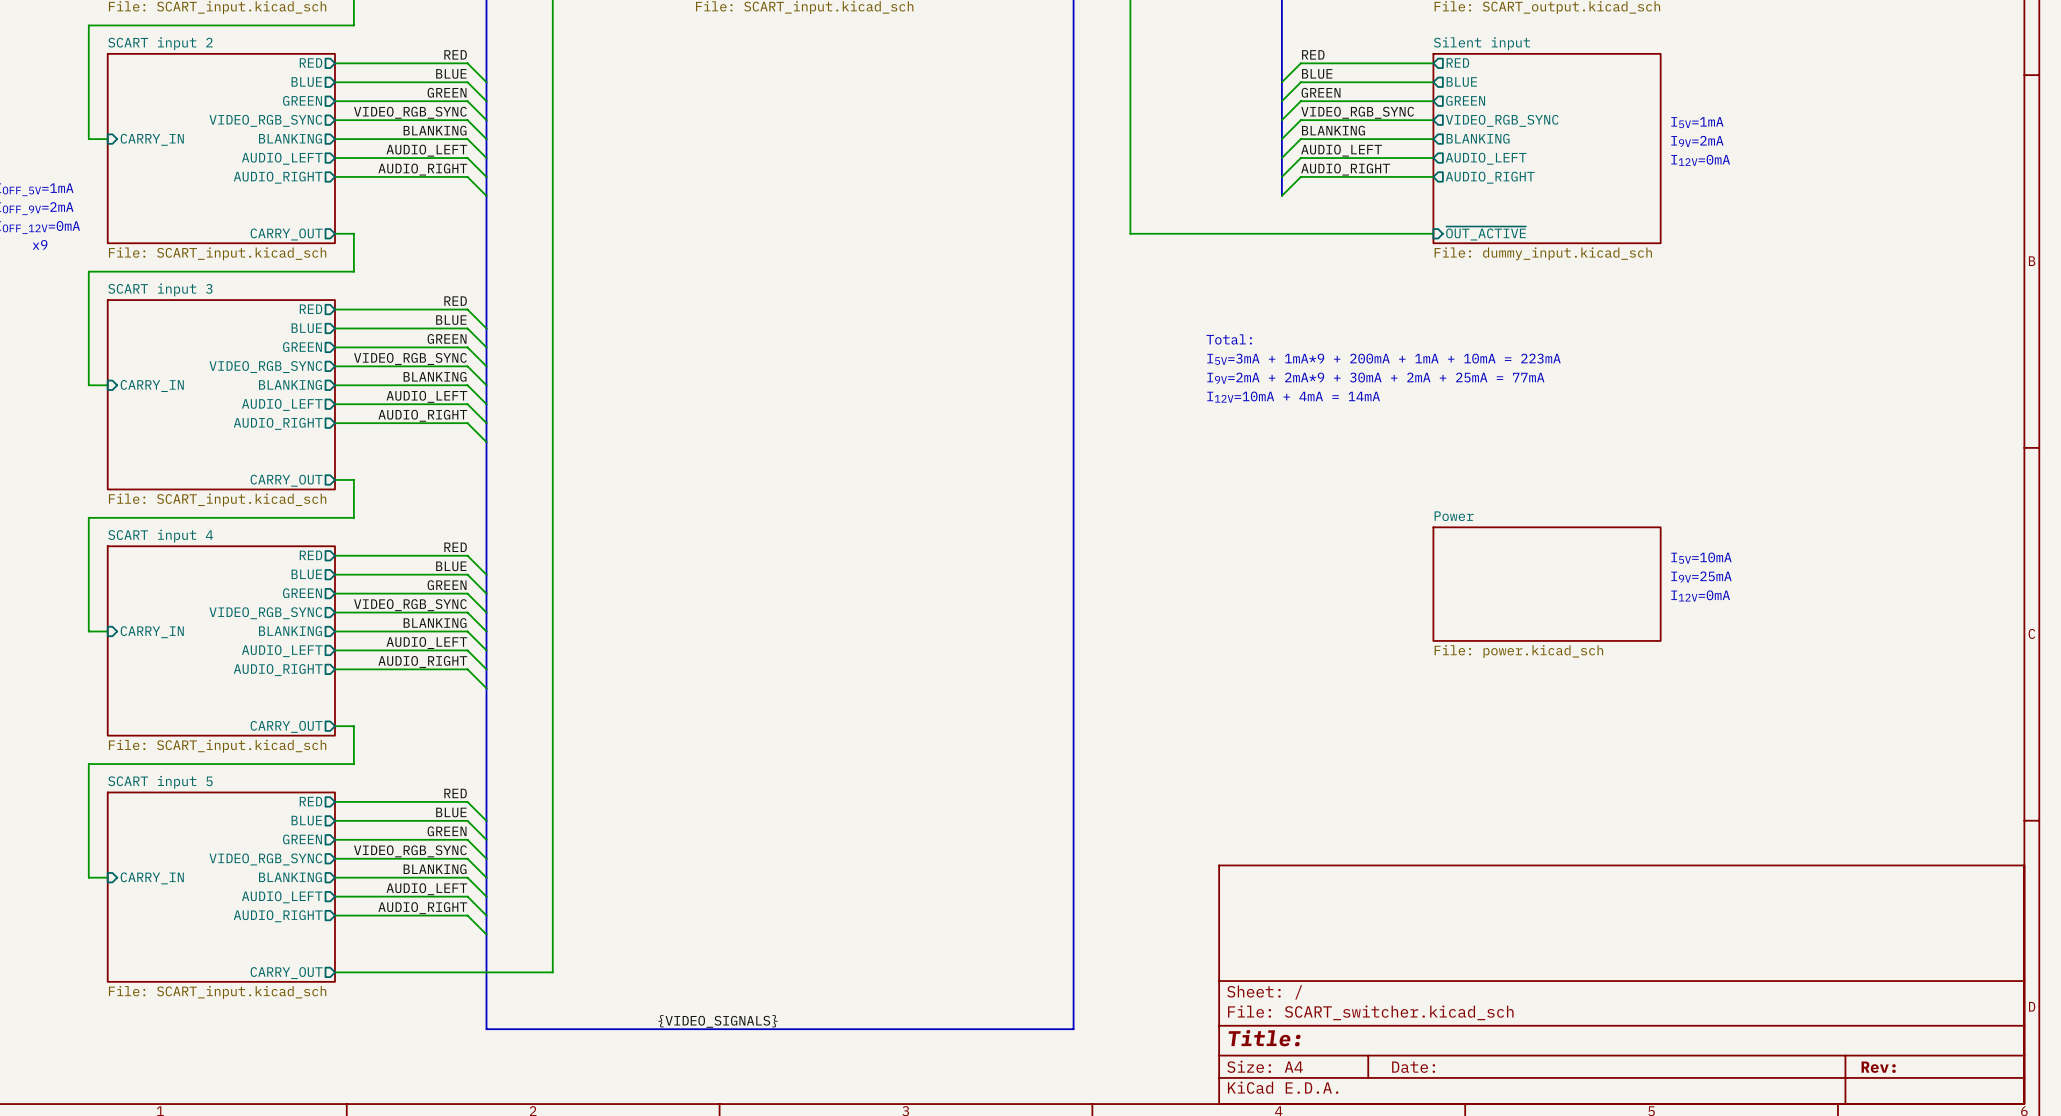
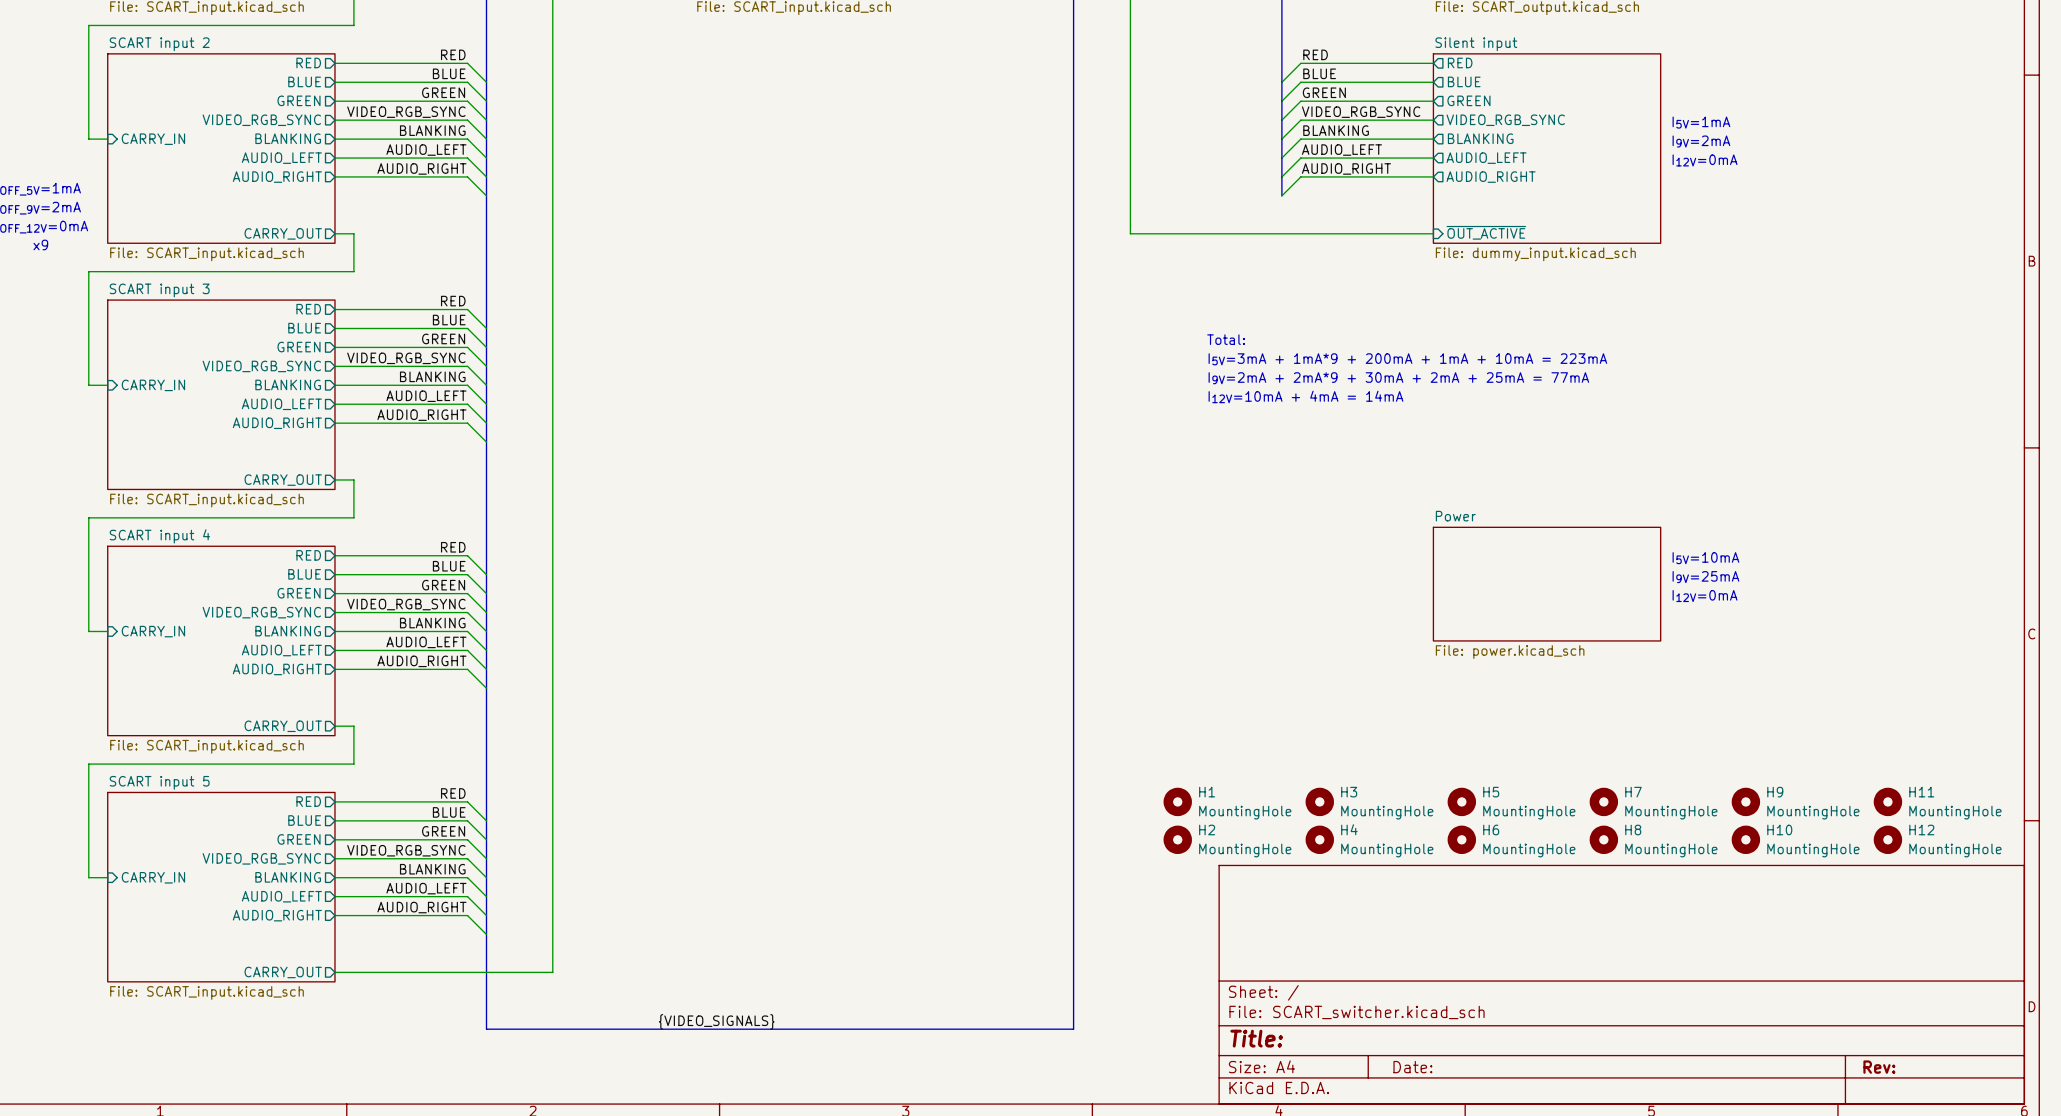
H1: none -> MountingHole (1177, 801)
H3: none -> MountingHole (1319, 801)
H5: none -> MountingHole (1461, 801)
H7: none -> MountingHole (1603, 801)
H9: none -> MountingHole (1745, 801)
H11: none -> MountingHole (1887, 801)
H2: none -> MountingHole (1177, 839)
H4: none -> MountingHole (1319, 839)
H6: none -> MountingHole (1461, 839)
H8: none -> MountingHole (1603, 839)
H10: none -> MountingHole (1745, 839)
H12: none -> MountingHole (1887, 839)

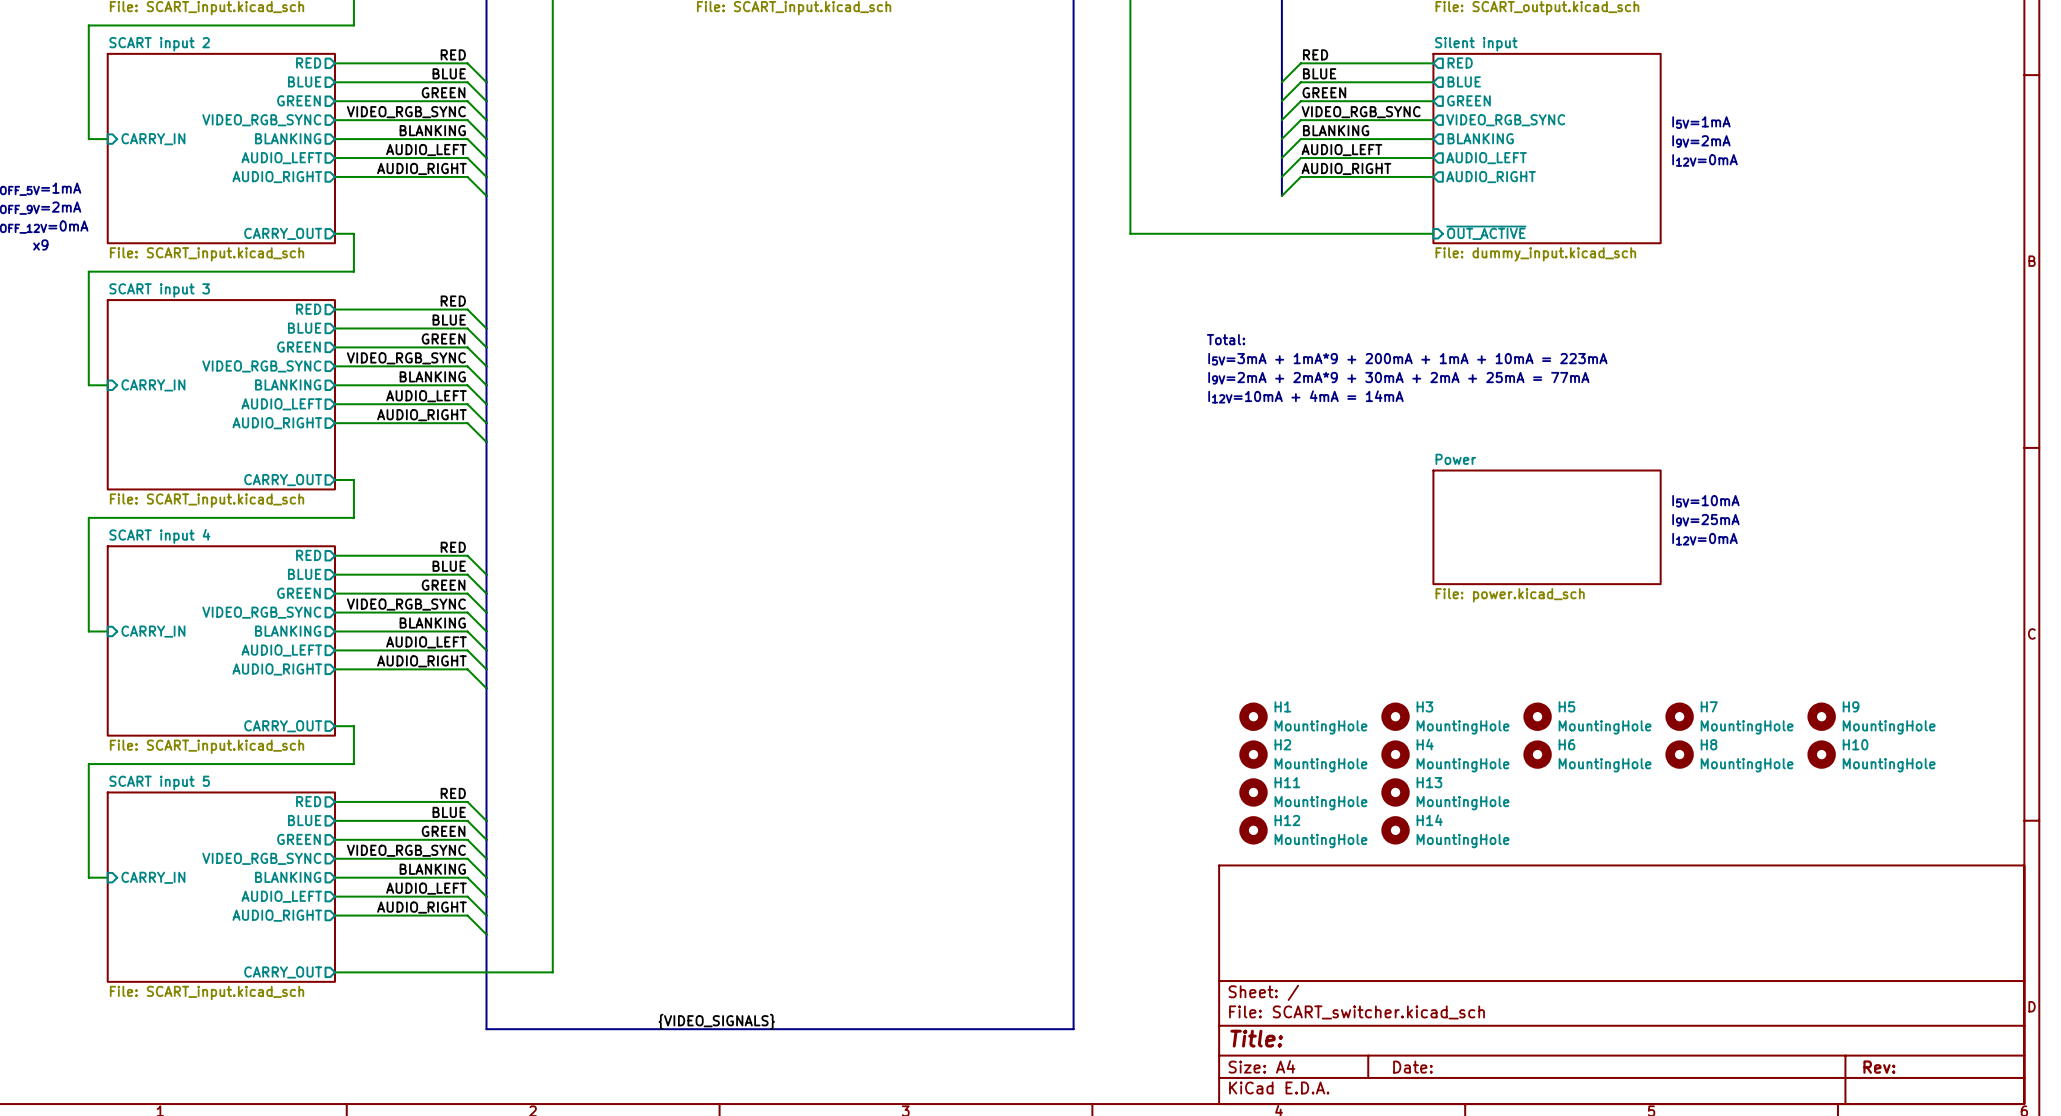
text position: I5V=10mA (1705, 558) -> I5V=10mA (1705, 501)
text position: I9V=25mA (1705, 577) -> I9V=25mA (1705, 520)
sheet Power position: (1547, 584) -> (1547, 527)
text position: I12V=0mA (1705, 596) -> I12V=0mA (1705, 539)
H13: none -> MountingHole (1395, 792)
H1 position: (1177, 801) -> (1253, 716)
H3 position: (1319, 801) -> (1395, 716)
H5 position: (1461, 801) -> (1537, 716)
H7 position: (1603, 801) -> (1679, 716)
H9 position: (1745, 801) -> (1821, 716)
H11 position: (1887, 801) -> (1253, 792)
H14: none -> MountingHole (1395, 830)
H2 position: (1177, 839) -> (1253, 754)
H4 position: (1319, 839) -> (1395, 754)
H6 position: (1461, 839) -> (1537, 754)
H8 position: (1603, 839) -> (1679, 754)
H10 position: (1745, 839) -> (1821, 754)
H12 position: (1887, 839) -> (1253, 830)

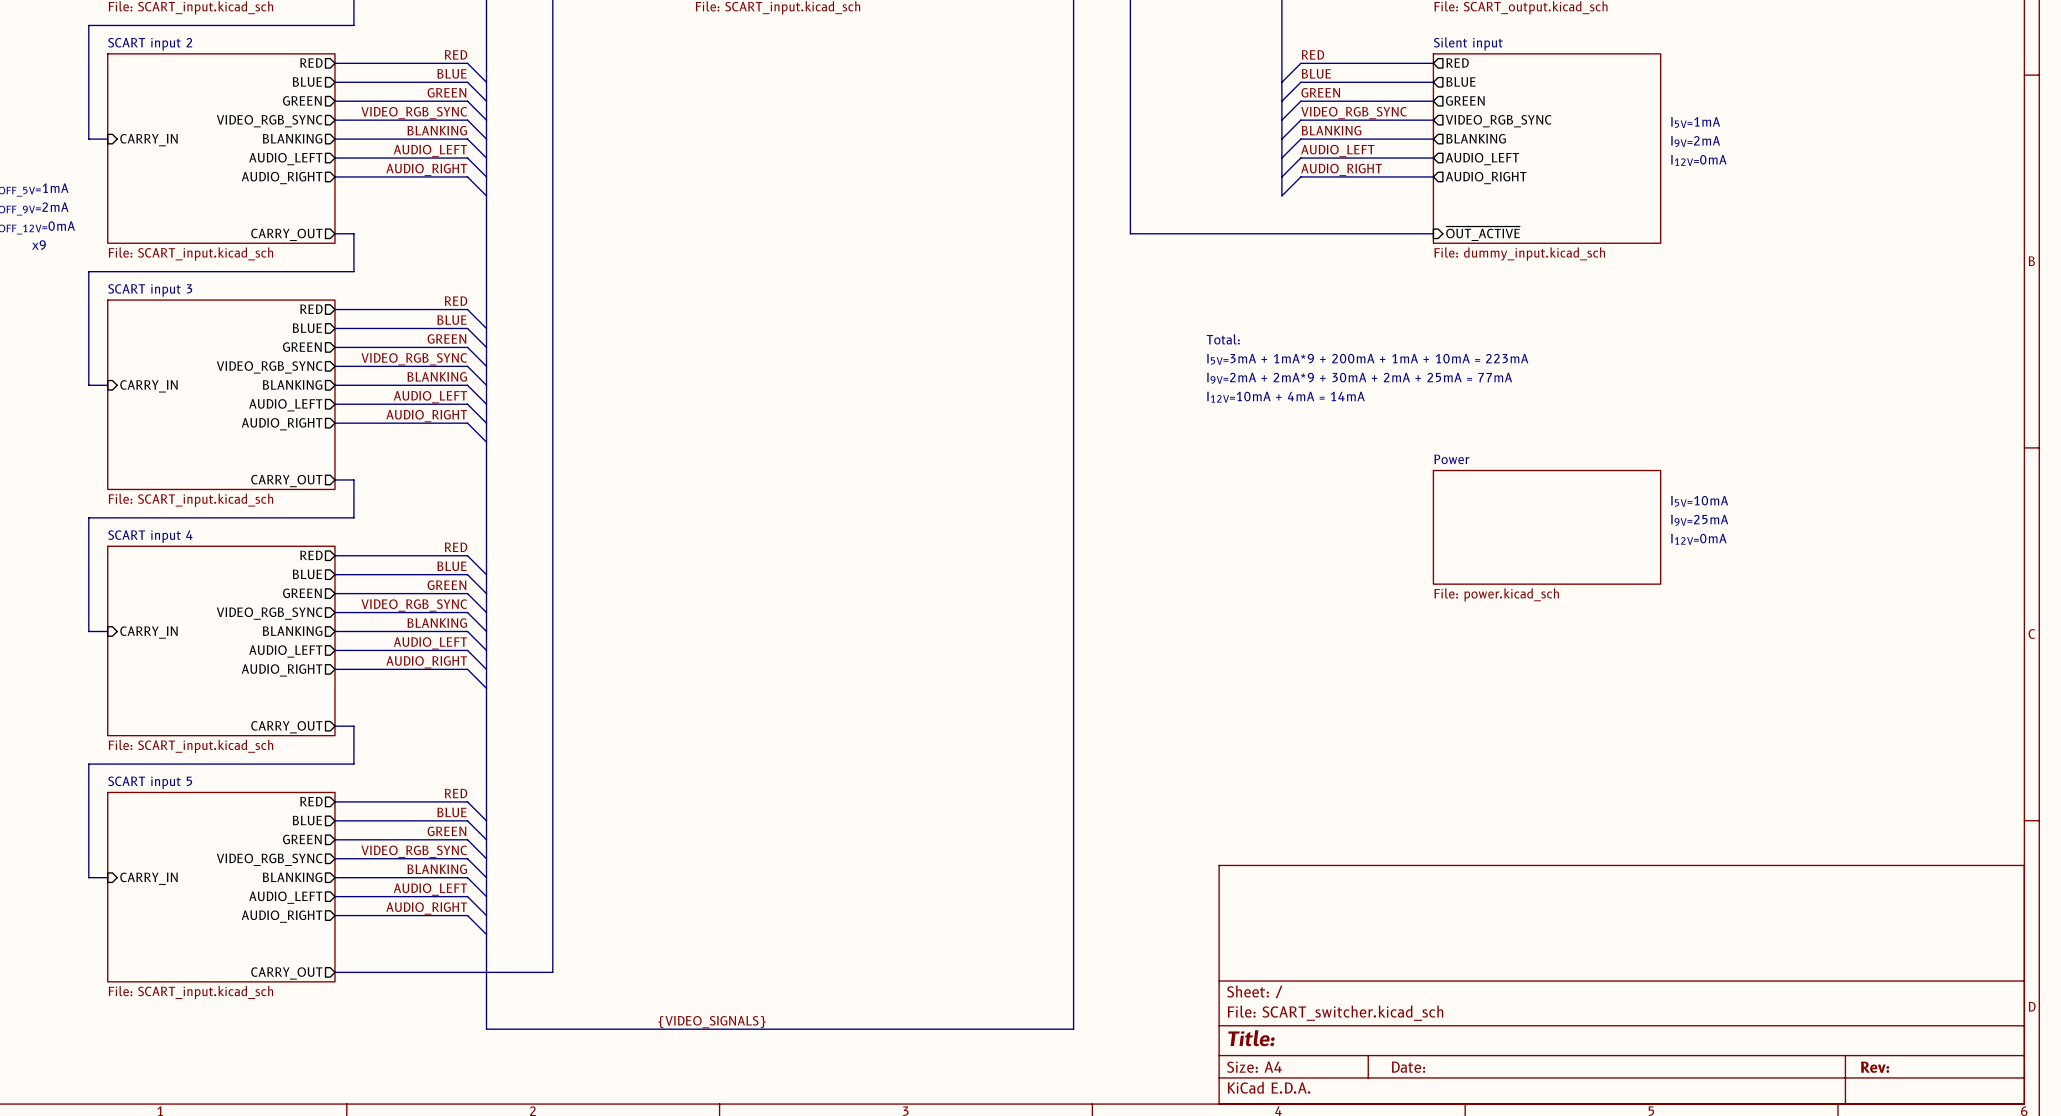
H1: MountingHole (1253, 716) -> none
H3: MountingHole (1395, 716) -> none
H5: MountingHole (1537, 716) -> none
H7: MountingHole (1679, 716) -> none
H9: MountingHole (1821, 716) -> none
H2: MountingHole (1253, 754) -> none
H4: MountingHole (1395, 754) -> none
H6: MountingHole (1537, 754) -> none
H8: MountingHole (1679, 754) -> none
H10: MountingHole (1821, 754) -> none
H11: MountingHole (1253, 792) -> none
H13: MountingHole (1395, 792) -> none
H12: MountingHole (1253, 830) -> none
H14: MountingHole (1395, 830) -> none

